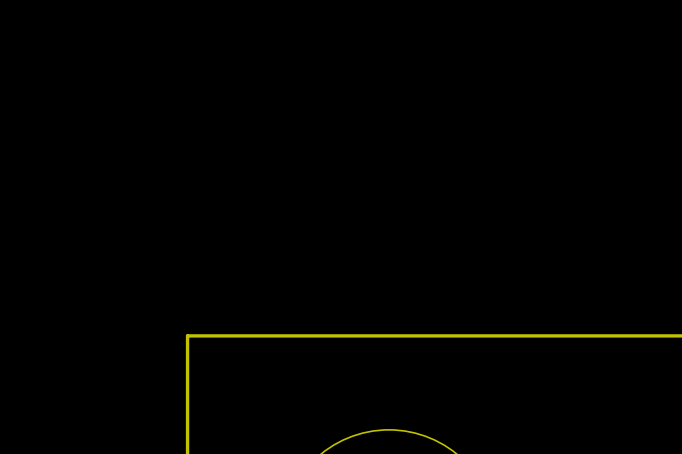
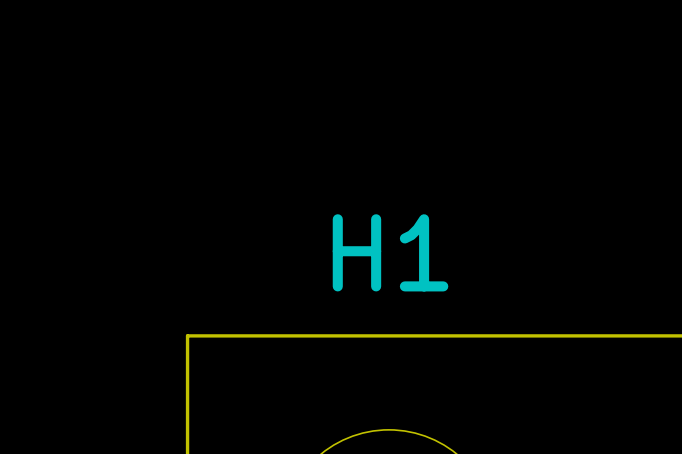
H1 name: none -> H1 (390, 252)

